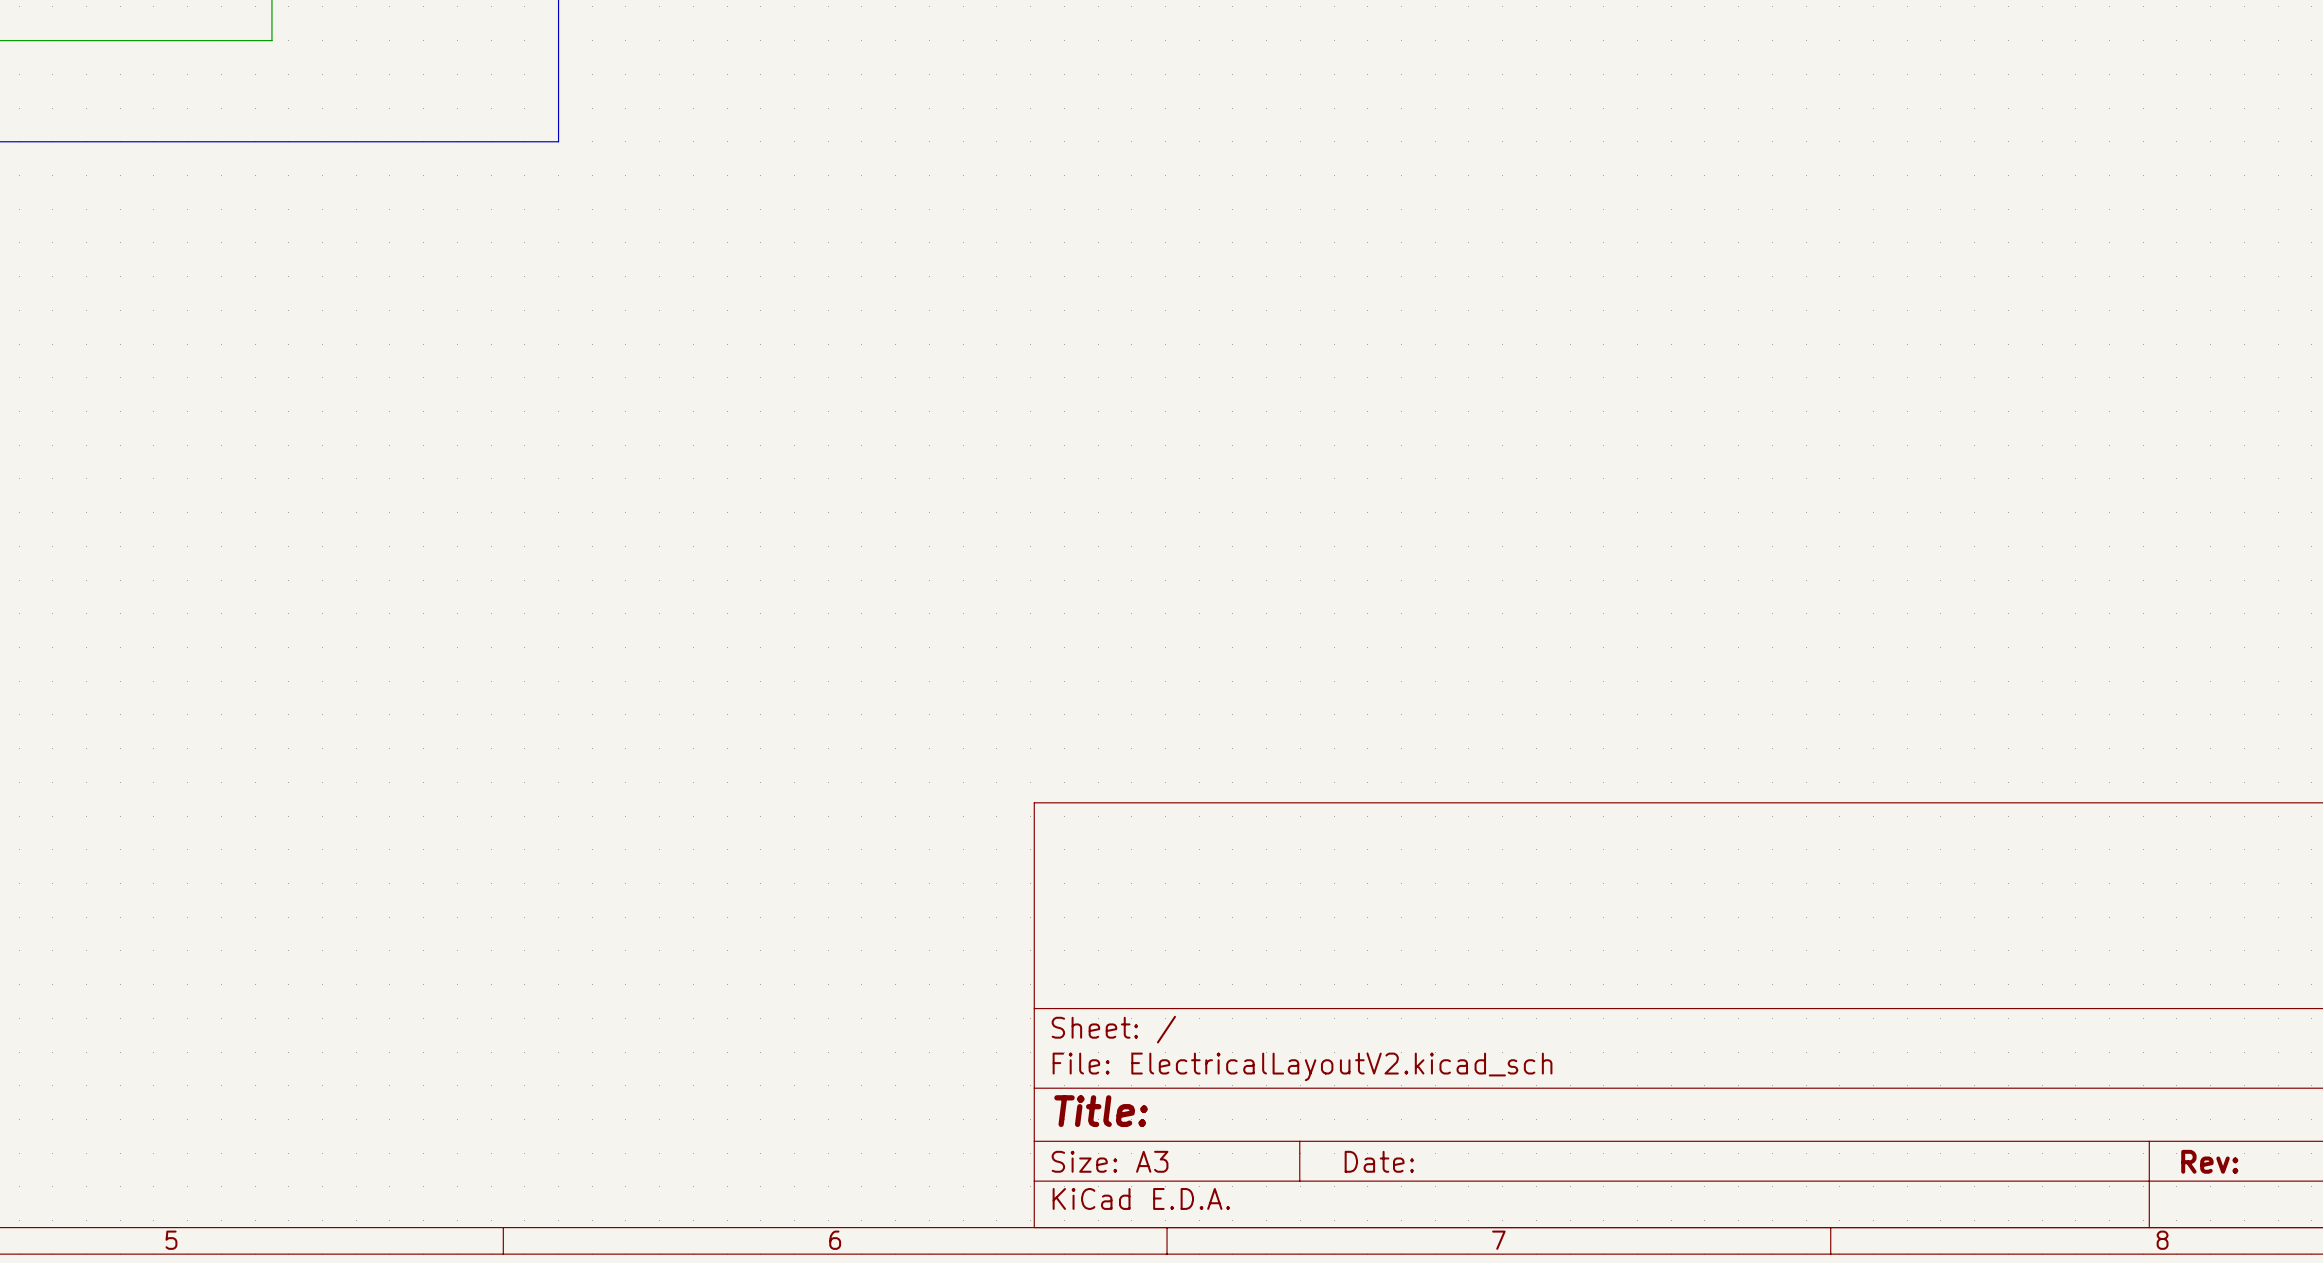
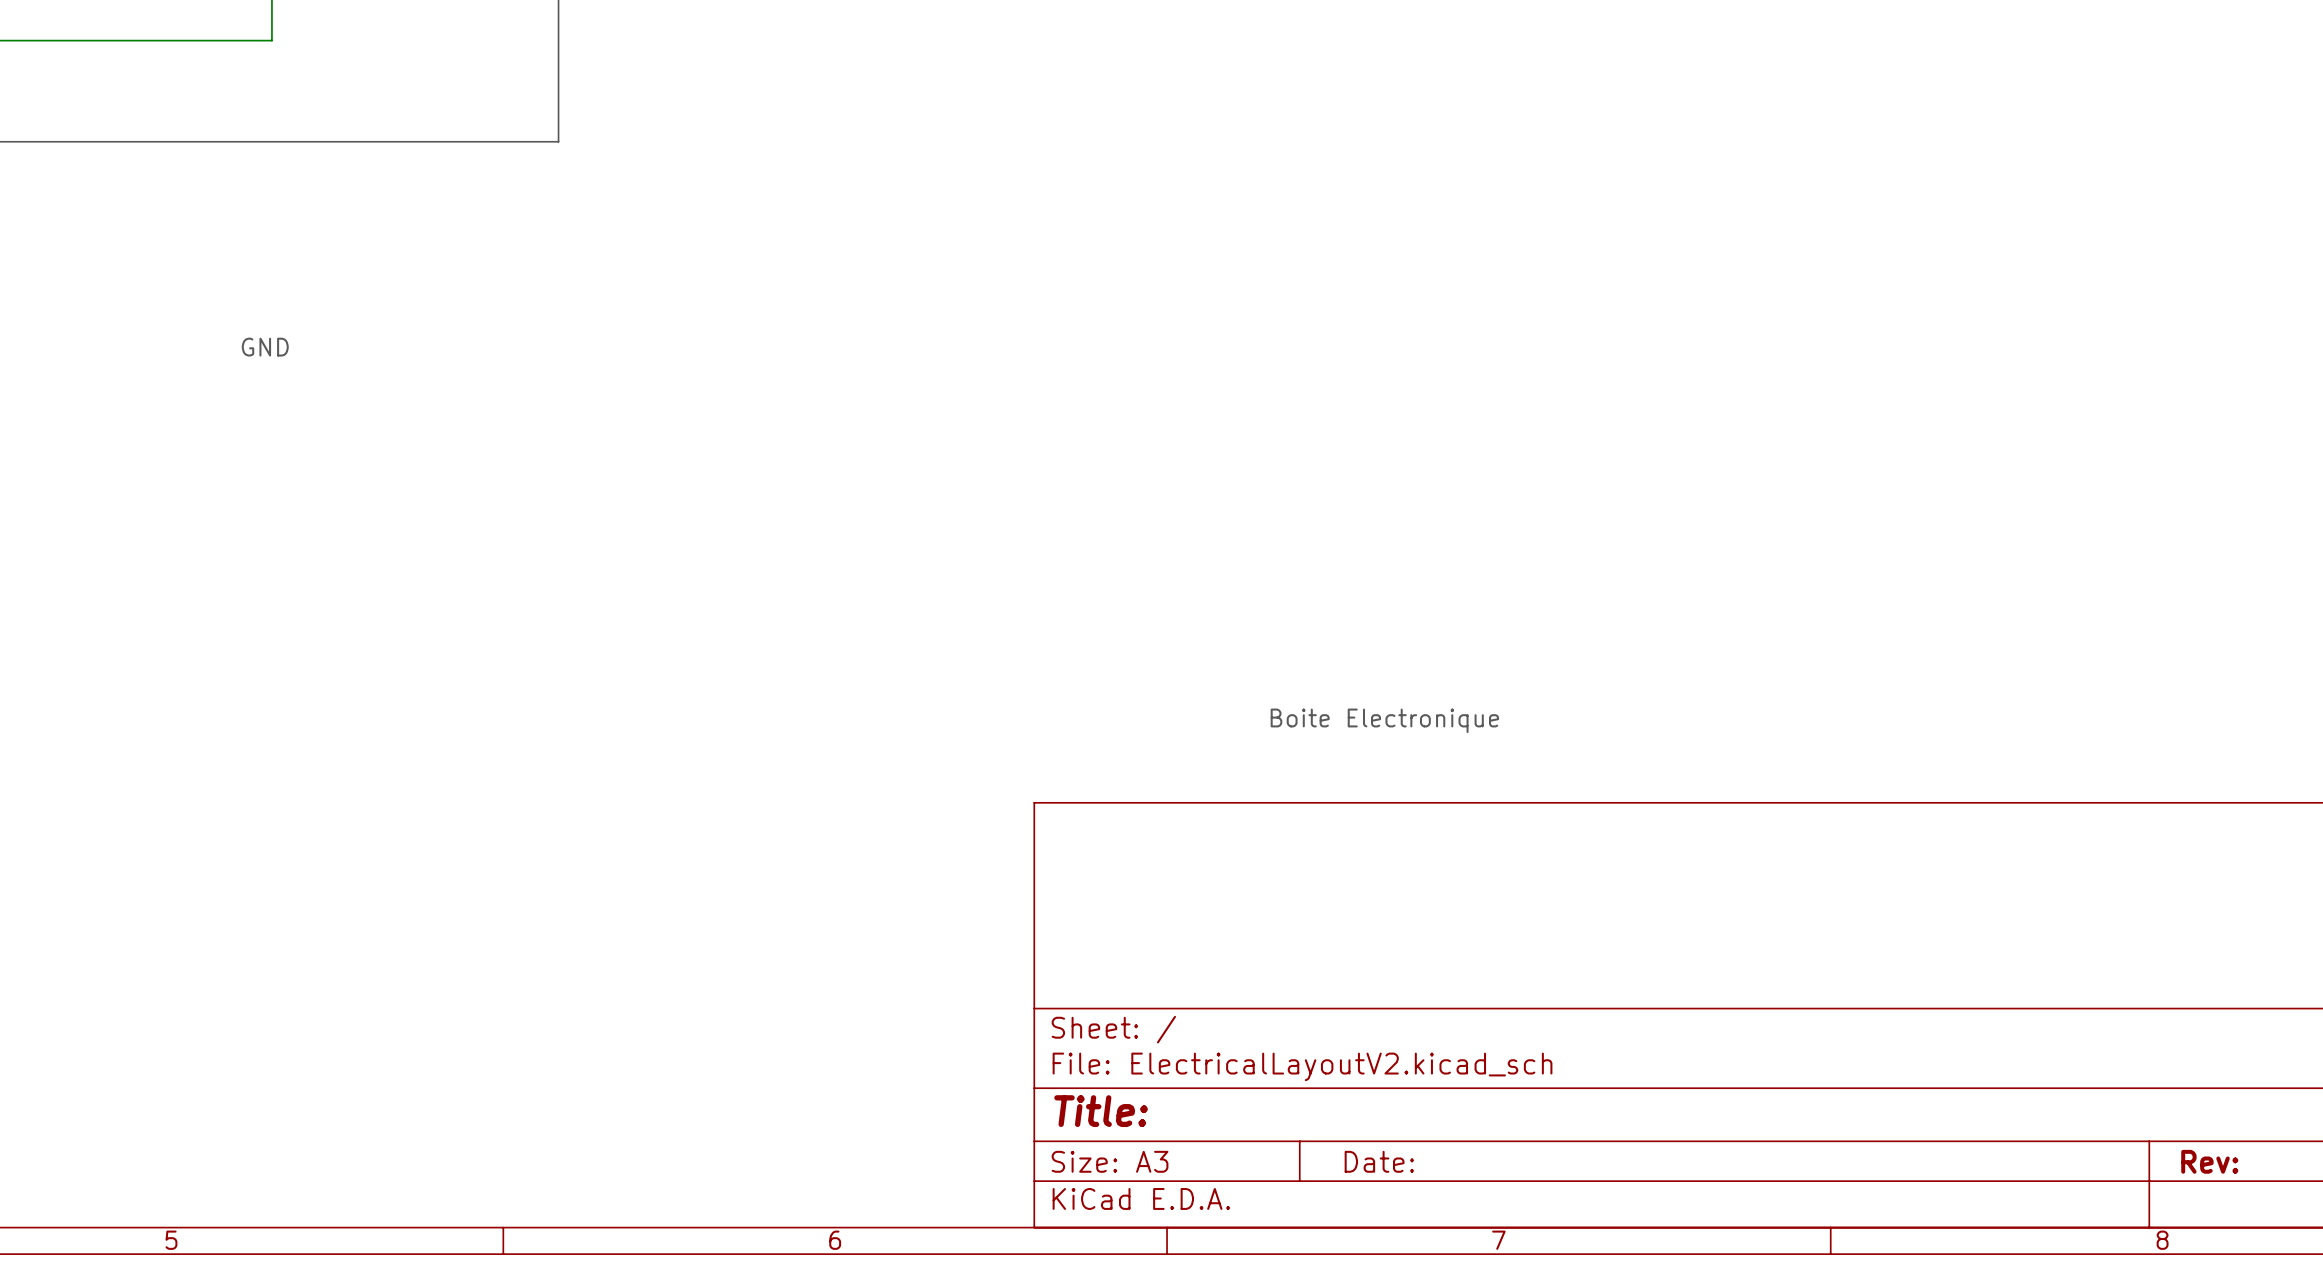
text: none -> GND (265, 347)
text: none -> Boite Electronique (1384, 720)

